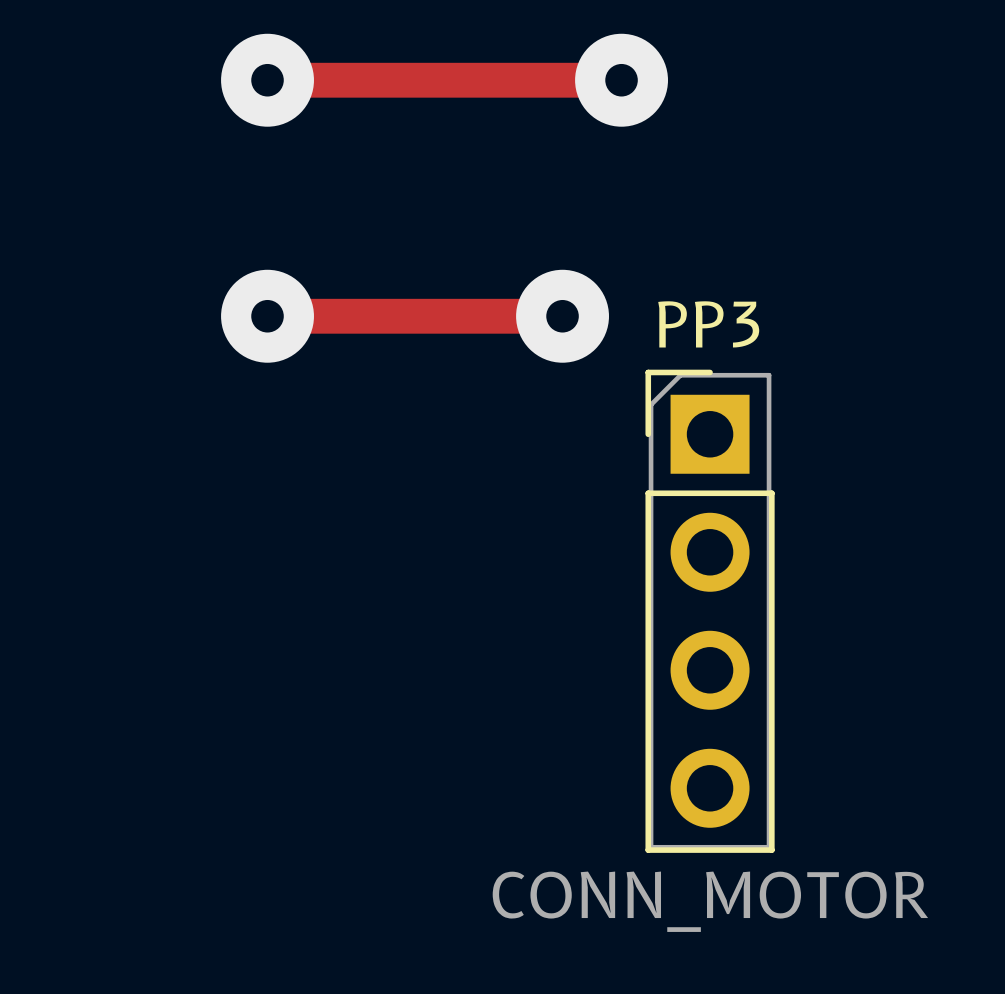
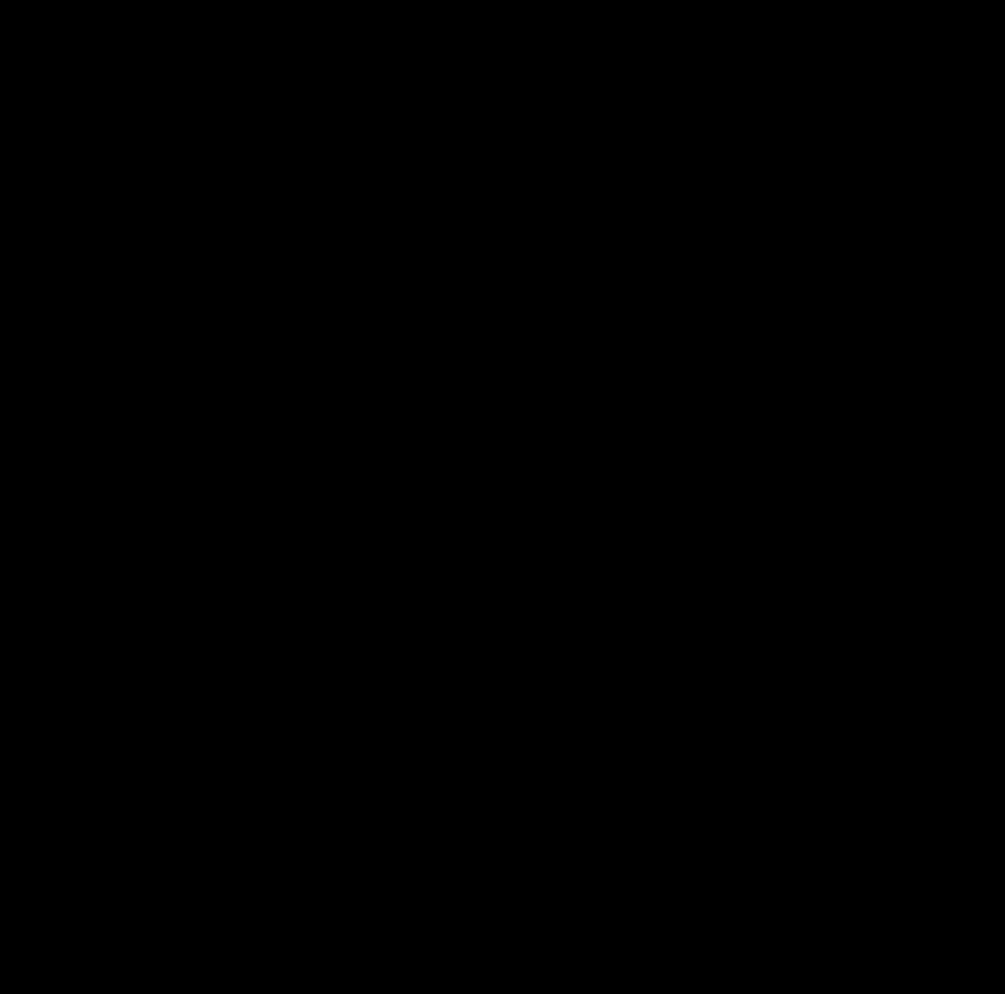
track: (267, 80) (621, 80) -> none
via: (267, 80) -> none
via: (621, 80) -> none
track: (267, 316) (562, 316) -> none
via: (267, 316) -> none
via: (562, 316) -> none
PP3: CONN_MOTOR (710, 611) -> none

